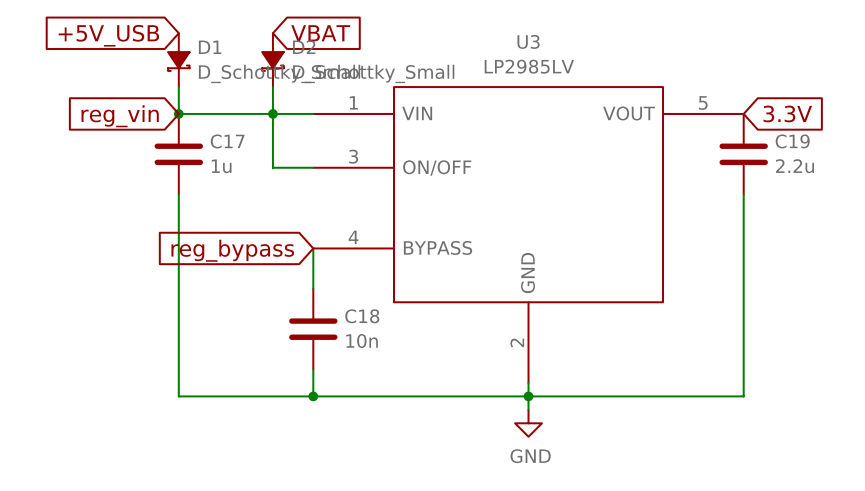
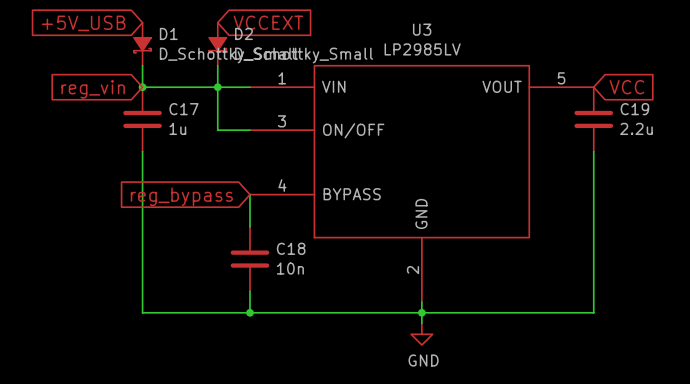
global label: VBAT (320, 33) -> VCCEXT (268, 22)
global label: 3.3V (787, 113) -> VCC (626, 87)

